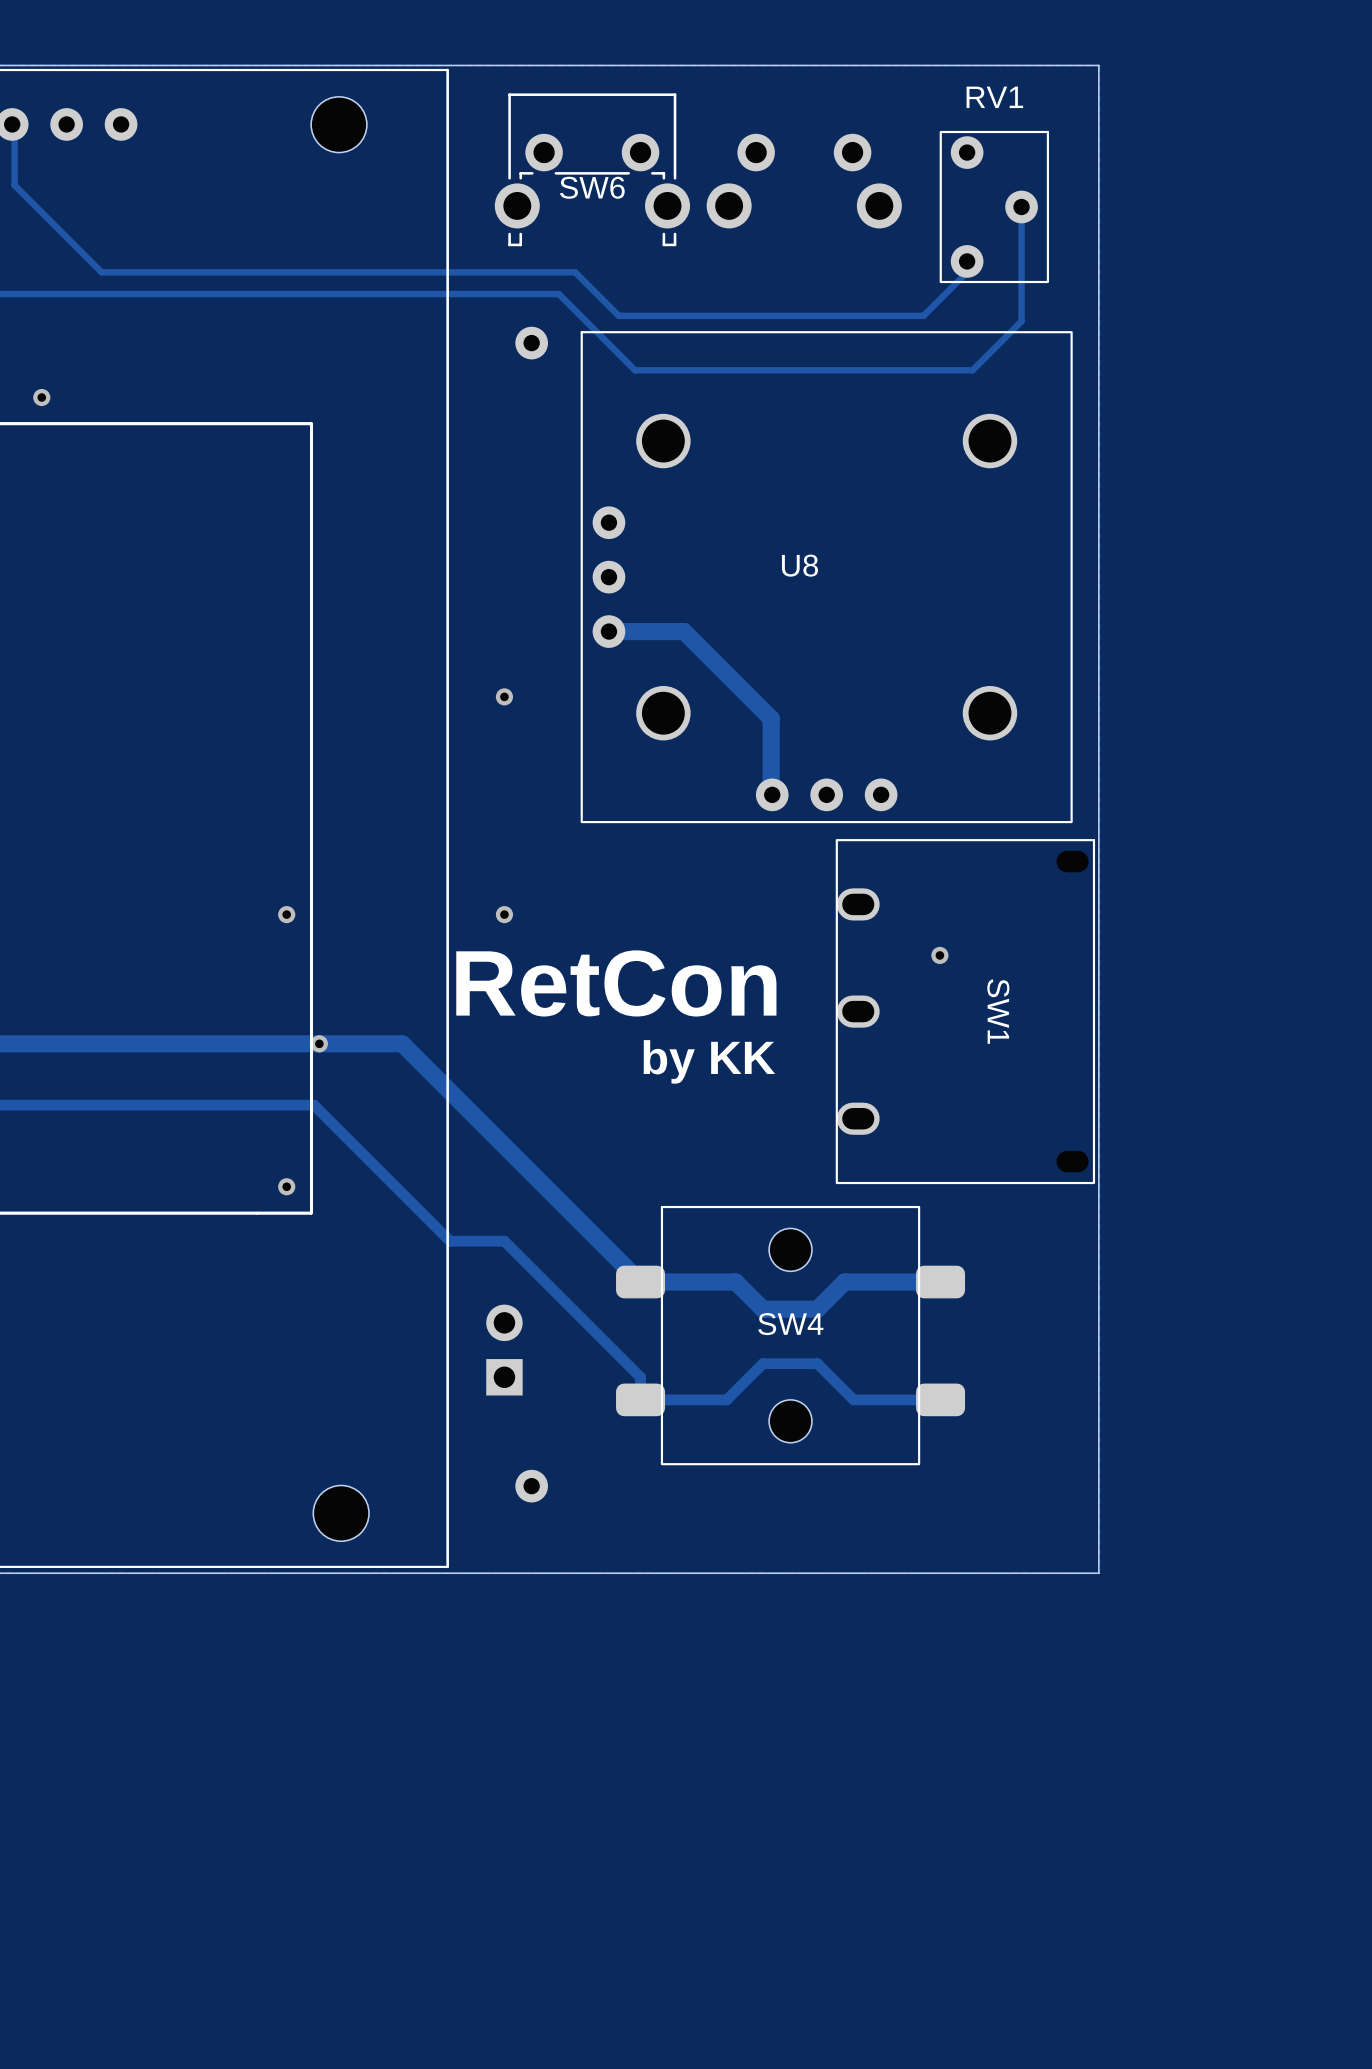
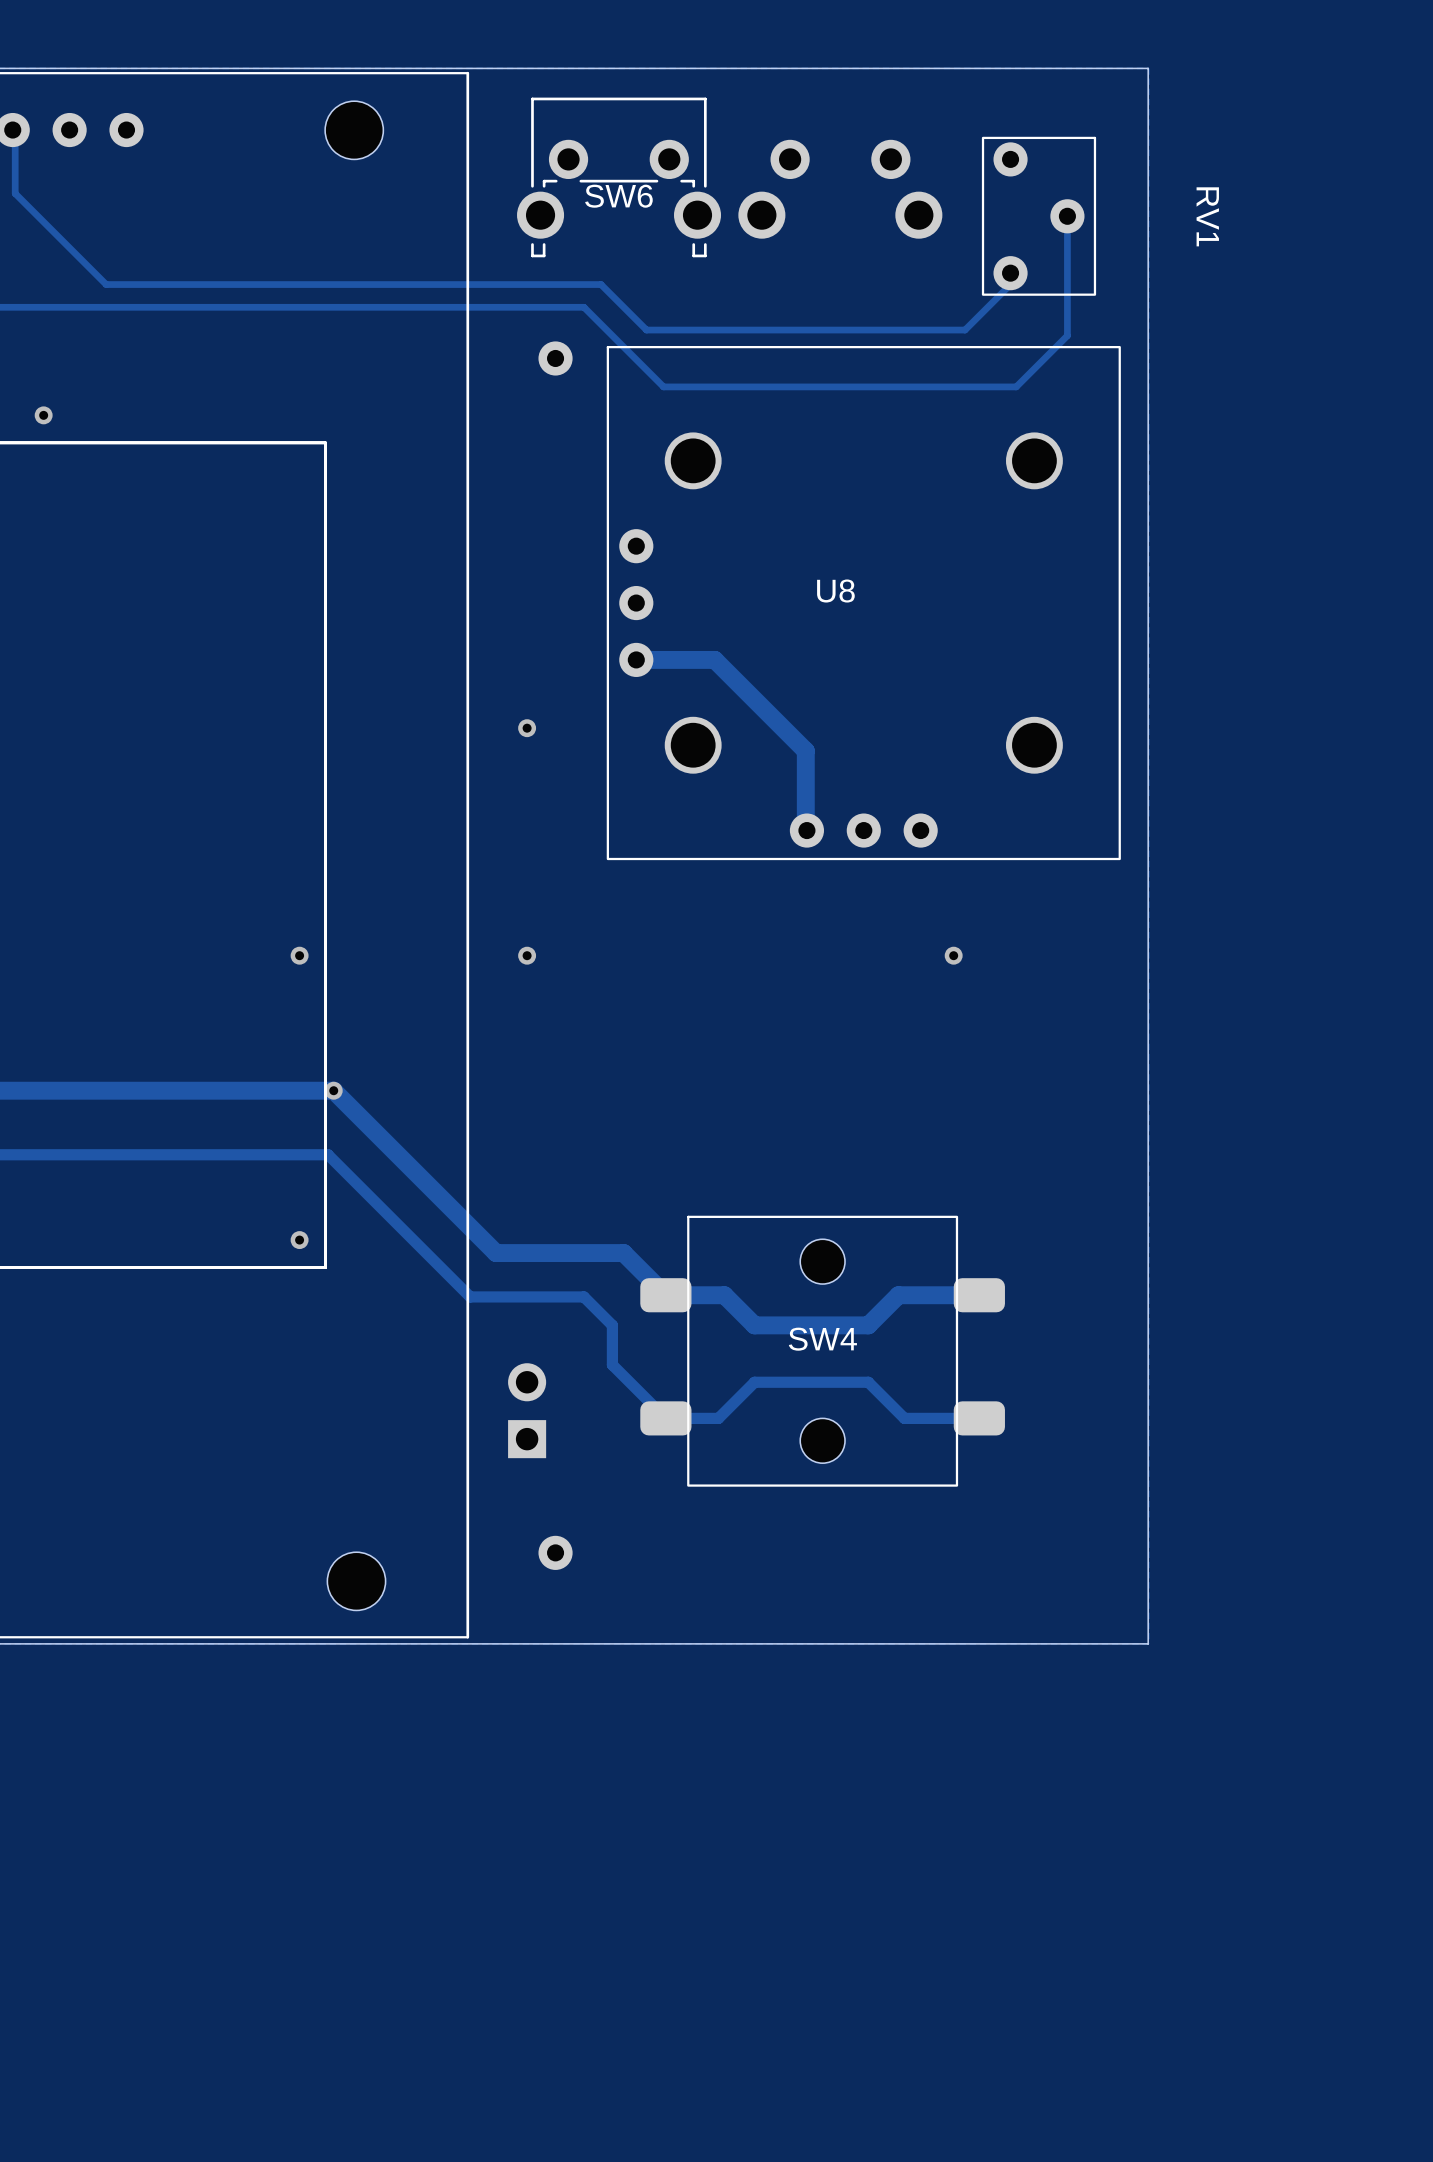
RV1 name rotation: 0° (994, 97) -> 90° clockwise (1207, 216)
RV1 name position: RV1 (994, 97) -> RV1 (1207, 216)
via position: (939, 955) -> (953, 955)
text: RetCon (616, 983) -> none
SW1: (965, 1011) -> none
track: (319, 1043) (402, 1043) (640, 1282) (735, 1282) (763, 1309) (817, 1309) (844, 1282) (940, 1282) -> (333, 1090) (496, 1253) (623, 1253) (665, 1295) (724, 1295) (754, 1325) (868, 1325) (898, 1295) (979, 1295)
text: by KK (709, 1061) -> none
track: (504, 1241) (640, 1377) (640, 1399) (726, 1399) (763, 1363) (817, 1363) (853, 1399) (940, 1399) -> (527, 1296) (583, 1296) (612, 1325) (612, 1364) (665, 1418) (718, 1418) (754, 1382) (868, 1382) (904, 1418) (979, 1418)
SW4 position: (790, 1335) -> (822, 1351)

